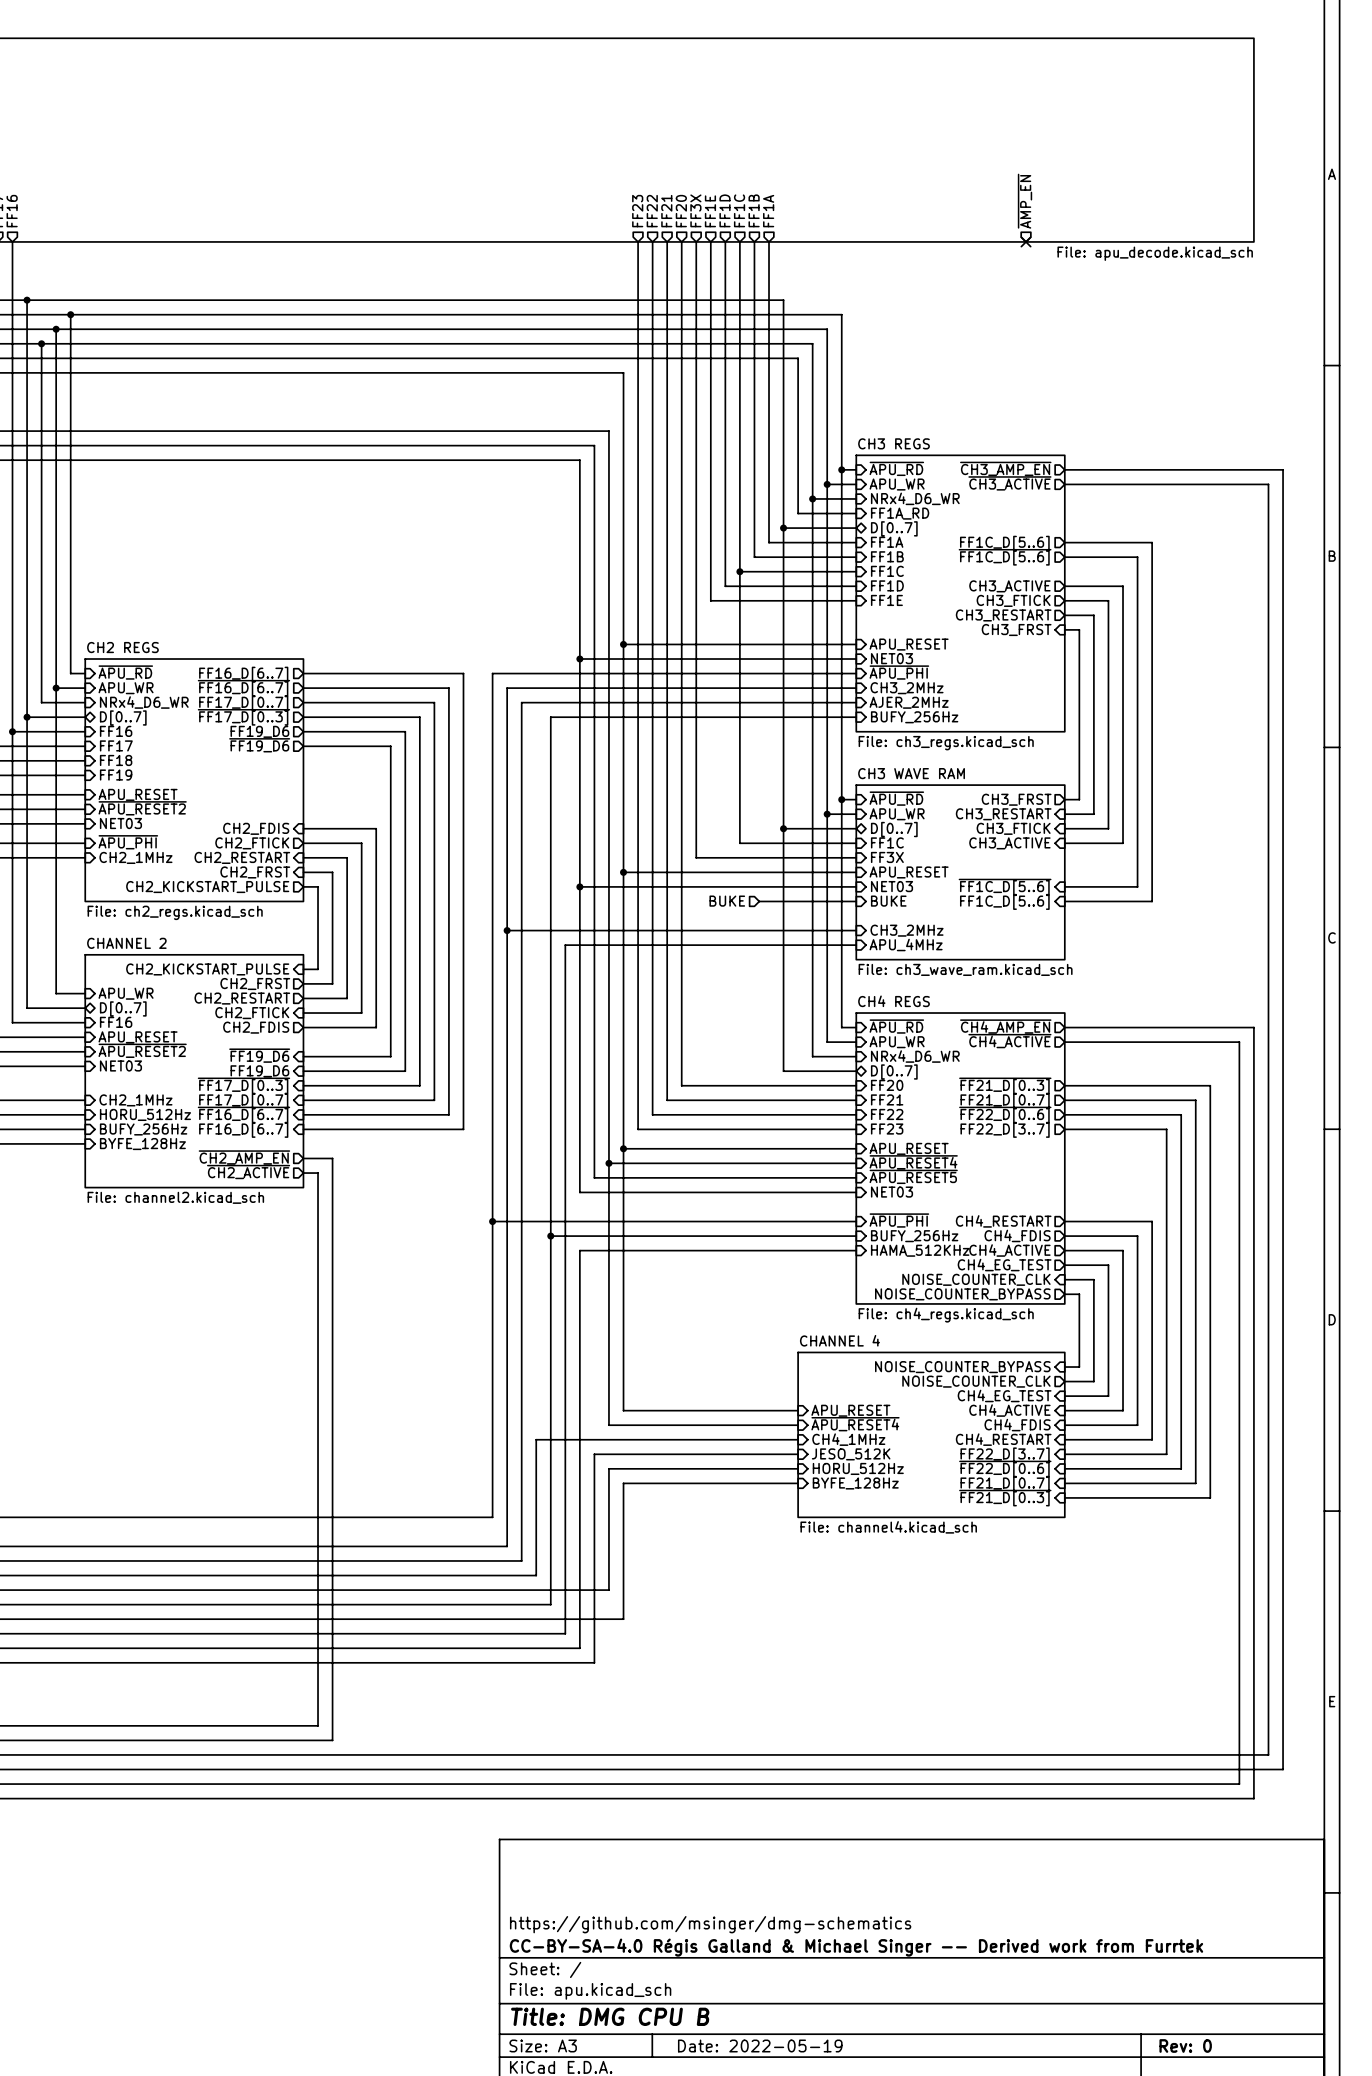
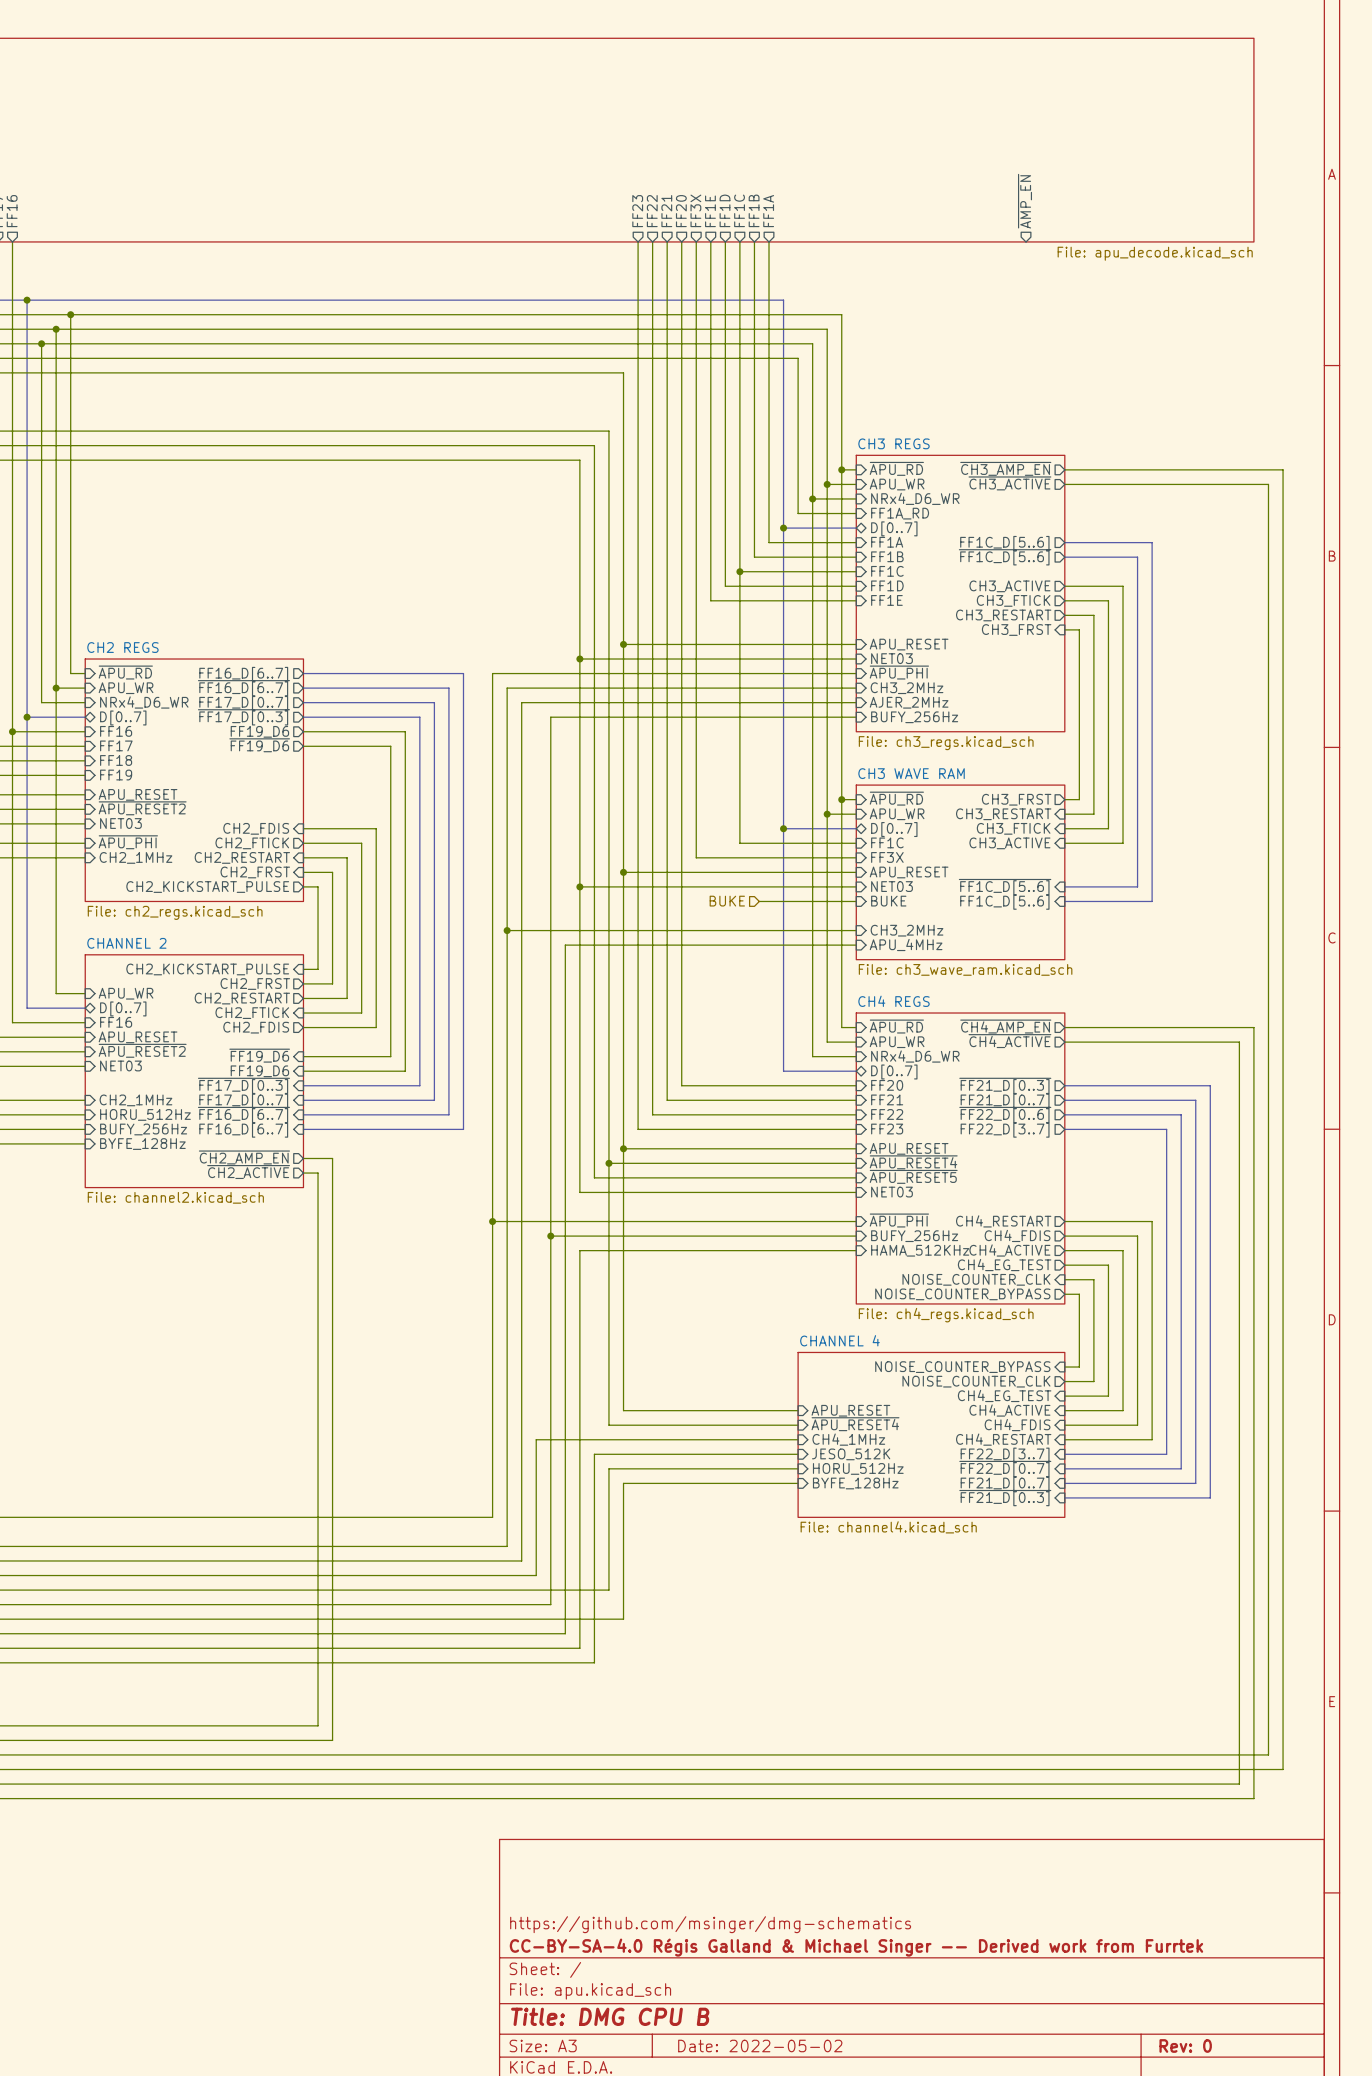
no-connect mark: (1026, 241) -> none
sheet pin: ~{FF22_D[0..6]} (1005, 1468) -> ~{FF22_D[0..7]} (1005, 1468)
title block: Date: 2022-05-19 (760, 2045) -> Date: 2022-05-02 (760, 2045)

